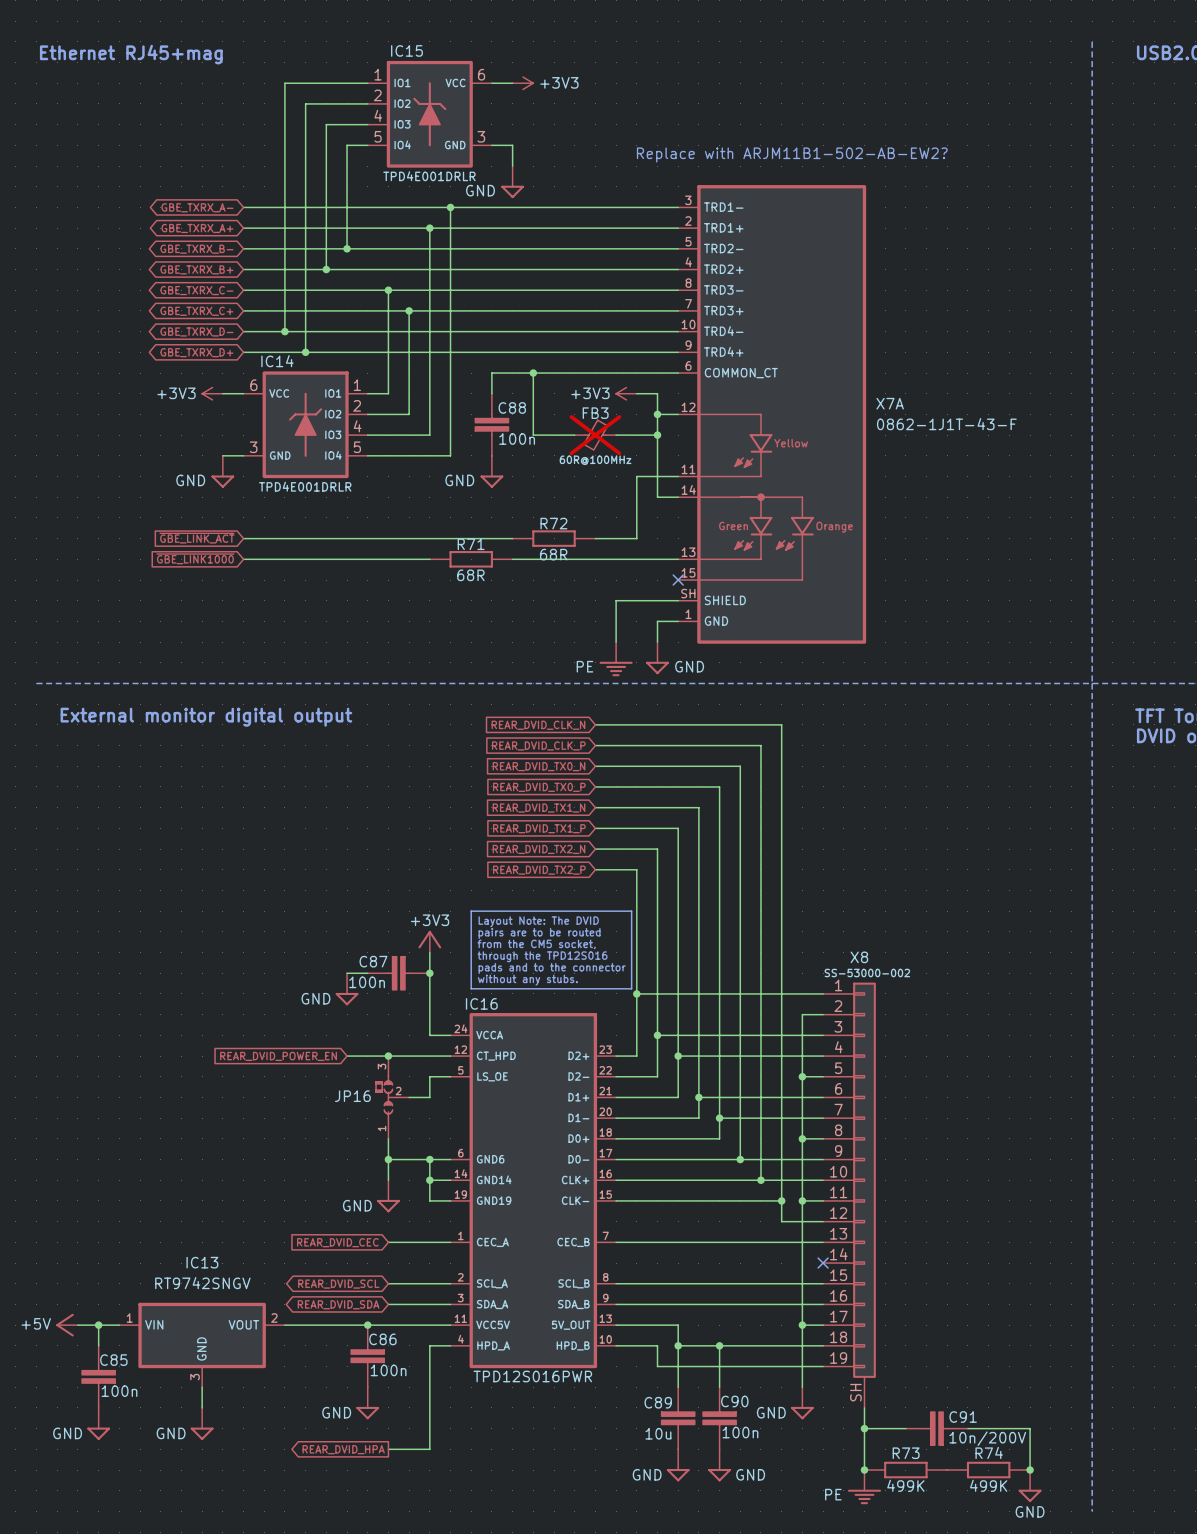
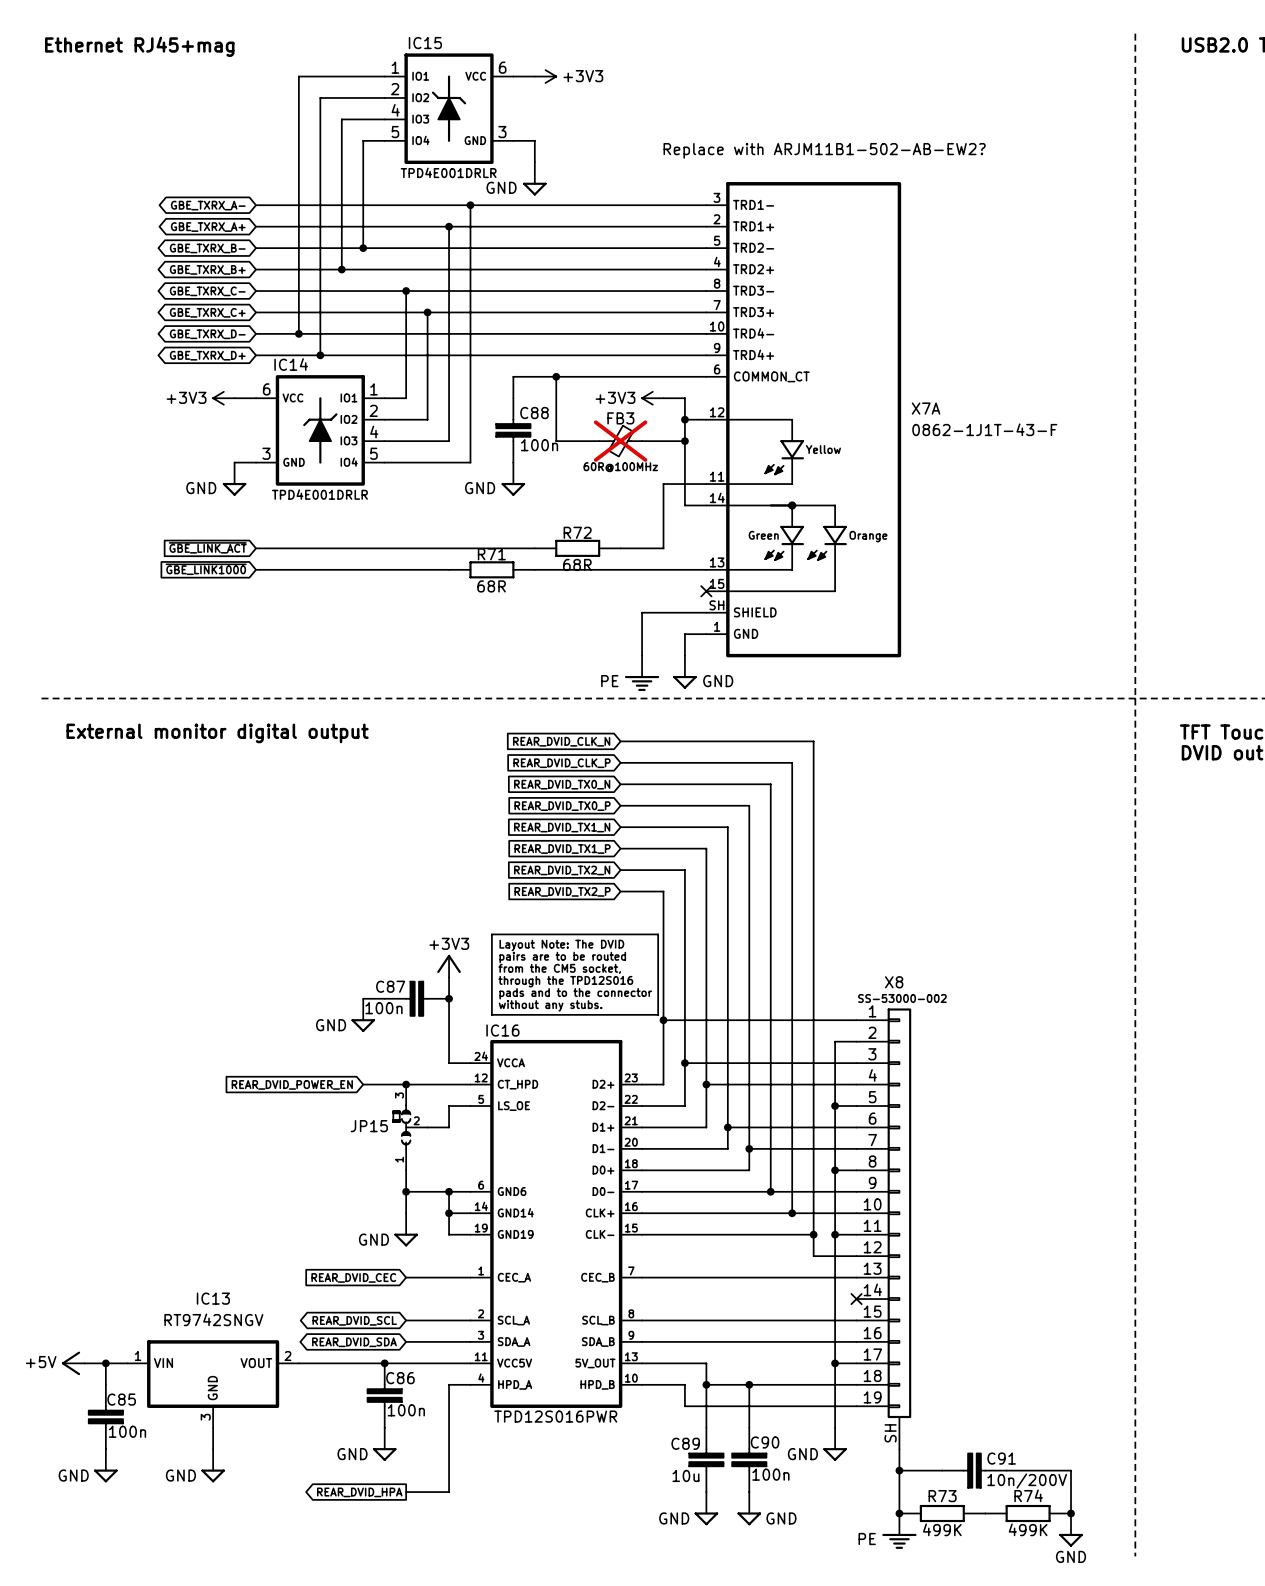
JP16 name: JP16 (352, 1096) -> JP15 (369, 1126)

